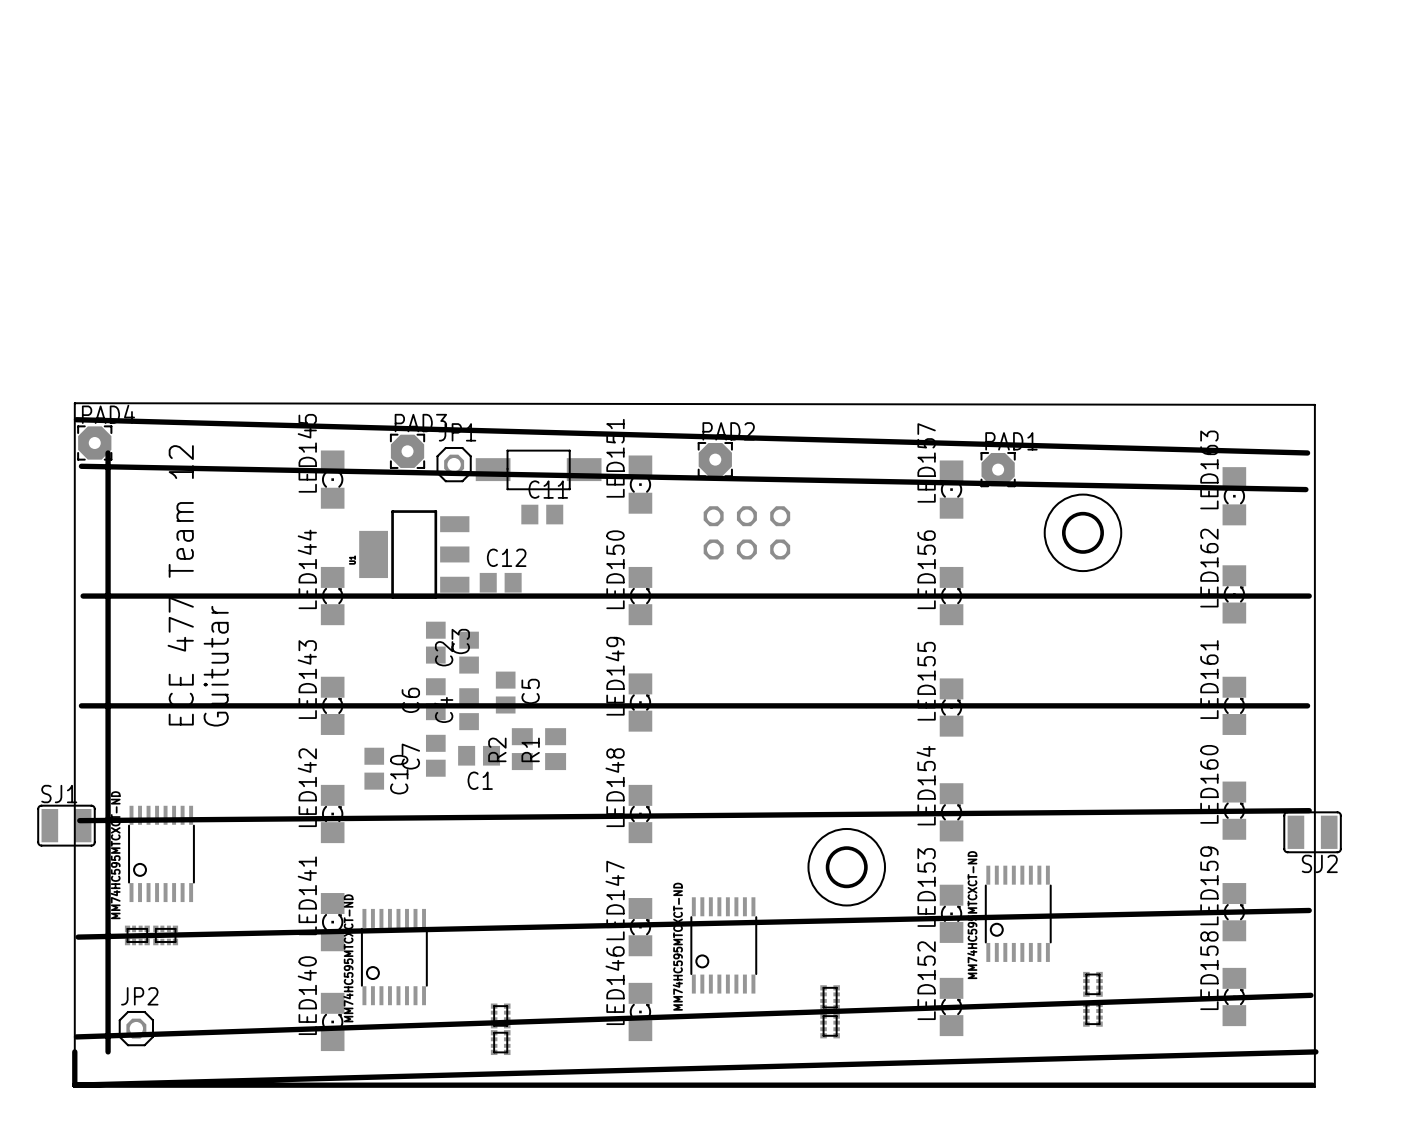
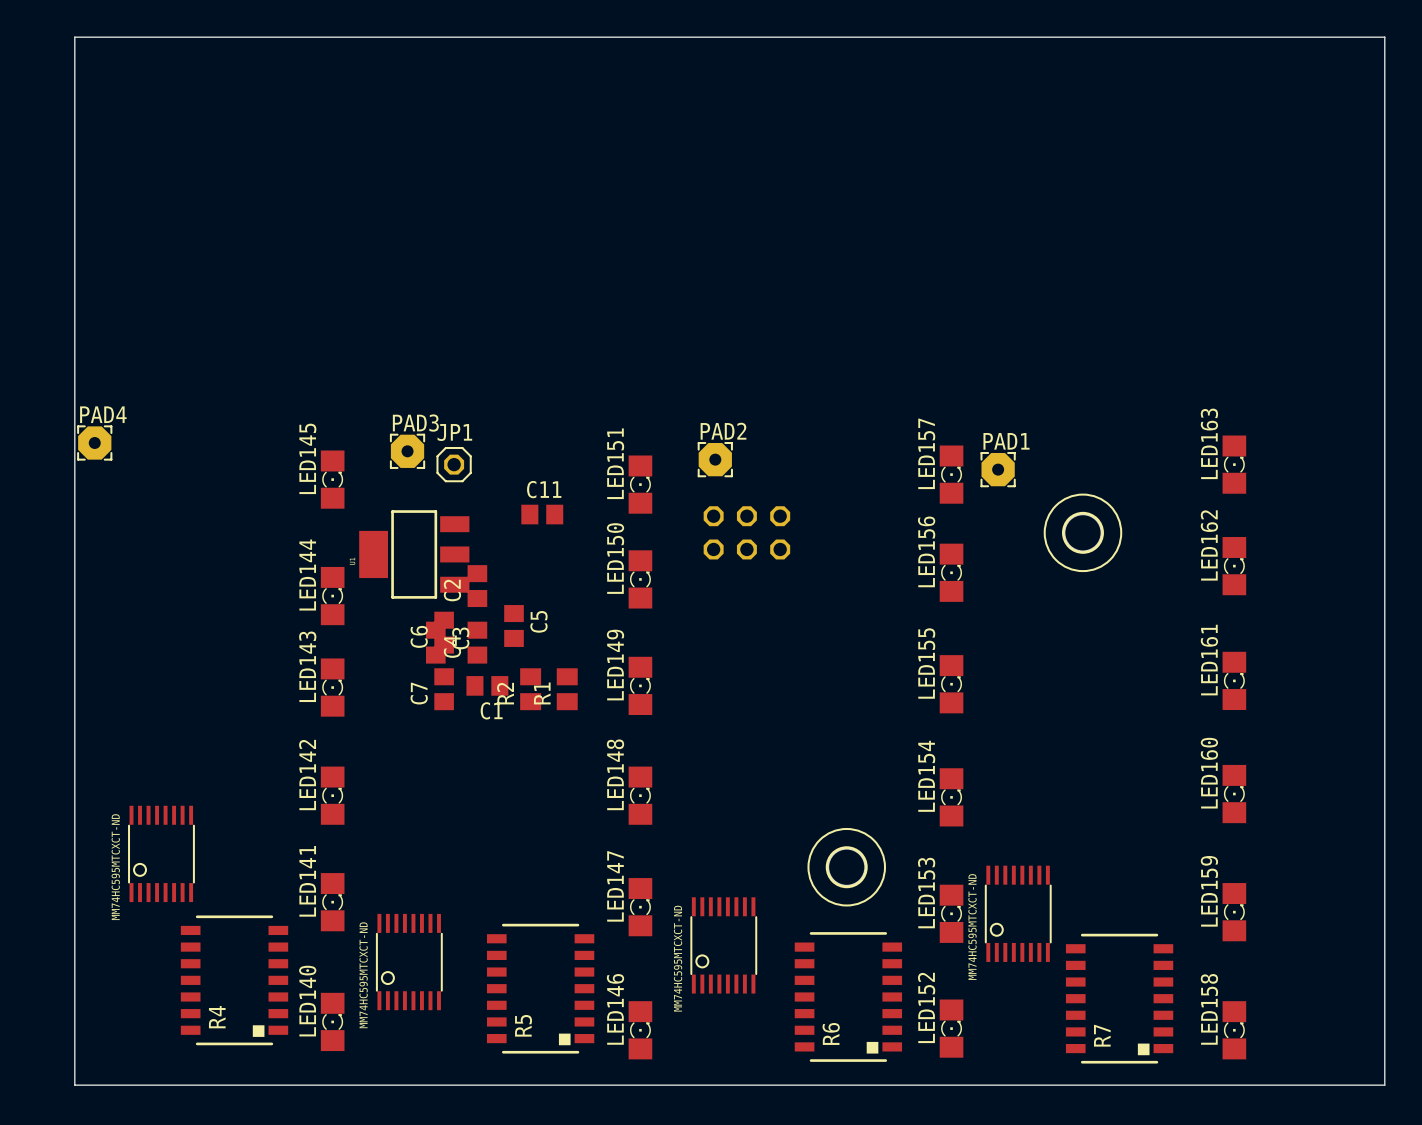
board edge: (74, 403) (1314, 404) (1314, 1086) (74, 1085) -> (74, 403) (74, 37) (1384, 37) (1384, 1085) (74, 1085)
line: (76, 419) (1307, 452) -> none
line: (108, 452) (108, 1051) -> none
line: (81, 466) (1305, 489) -> none
part: (538, 469) -> none
LED157 position: (951, 489) -> (951, 474)
LED163 position: (1234, 496) -> (1234, 464)
C12: (500, 582) -> none
text: ECE 477 Team 12 (180, 585) -> none
LED162 position: (1234, 594) -> (1234, 566)
line: (83, 596) (1309, 596) -> none
LED150 position: (640, 596) -> (640, 579)
LED156 position: (951, 596) -> (951, 572)
C2 position: (469, 652) -> (477, 586)
text: Guitutar (216, 666) -> none
C5 position: (505, 692) -> (514, 626)
C6 position: (435, 699) -> (444, 632)
LED149 position: (640, 702) -> (640, 685)
line: (81, 705) (1307, 705) -> none
LED143 position: (332, 705) -> (332, 687)
LED161 position: (1234, 705) -> (1234, 680)
LED155 position: (951, 707) -> (951, 684)
C4 position: (469, 709) -> (477, 642)
R2 position: (522, 749) -> (530, 689)
R1 position: (555, 749) -> (567, 689)
C7 position: (435, 755) -> (444, 689)
C1 position: (479, 755) -> (487, 685)
C10: (374, 768) -> none
LED160 position: (1234, 810) -> (1234, 794)
line: (1309, 810) (79, 820) -> none
LED154 position: (951, 812) -> (951, 797)
LED142 position: (332, 813) -> (332, 795)
LED148 position: (640, 813) -> (640, 795)
SJ1: (66, 825) -> none
SJ2: (1312, 832) -> none
line: (1309, 910) (78, 937) -> none
LED141 position: (332, 922) -> (332, 902)
LED147 position: (640, 927) -> (640, 907)
part: (137, 935) -> none
part: (165, 935) -> none
part position: (394, 957) -> (409, 962)
R4: none -> (234, 980)
part: (1092, 984) -> none
R5: none -> (540, 988)
line: (1310, 995) (76, 1036) -> none
part: (830, 997) -> none
R6: none -> (848, 997)
LED158 position: (1234, 997) -> (1234, 1030)
R7: none -> (1119, 998)
LED152 position: (951, 1006) -> (951, 1028)
LED146 position: (640, 1011) -> (640, 1030)
part: (1092, 1014) -> none
part: (500, 1015) -> none
part: (830, 1025) -> none
JP2: (136, 1028) -> none
part: (500, 1042) -> none
line: (74, 1051) (74, 1085) -> none
line: (1315, 1051) (74, 1085) -> none
line: (74, 1085) (1312, 1085) -> none

